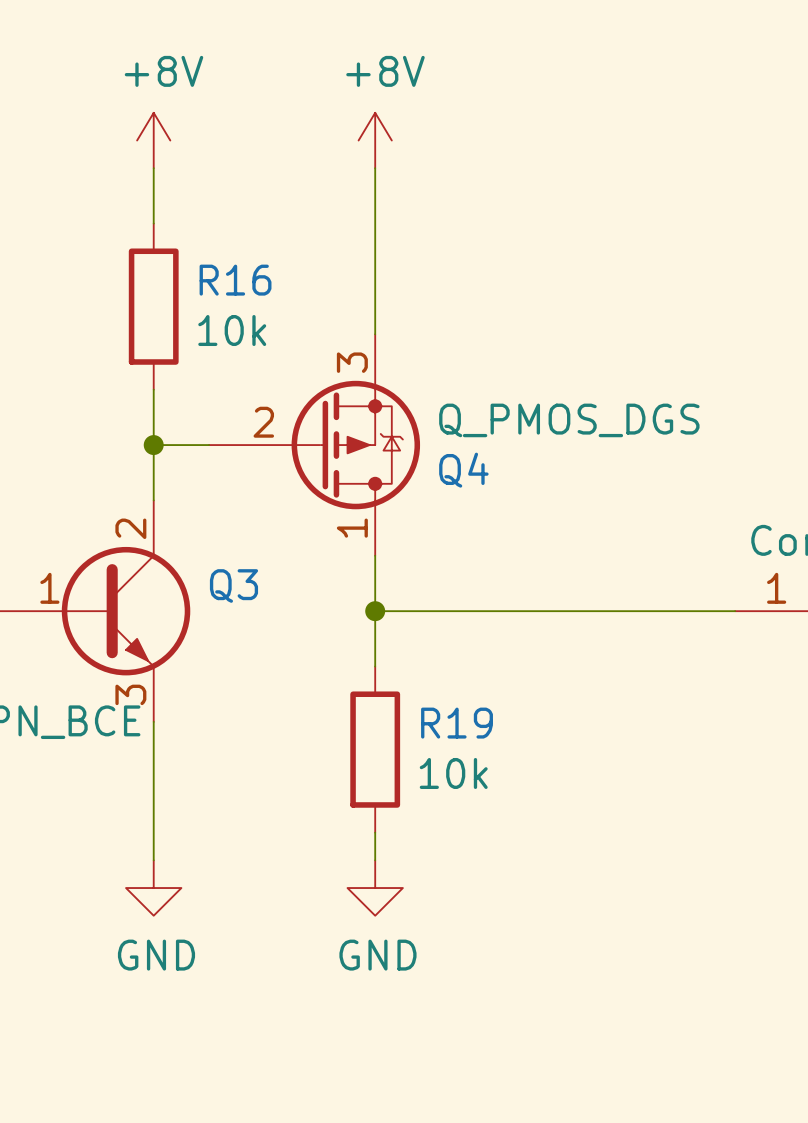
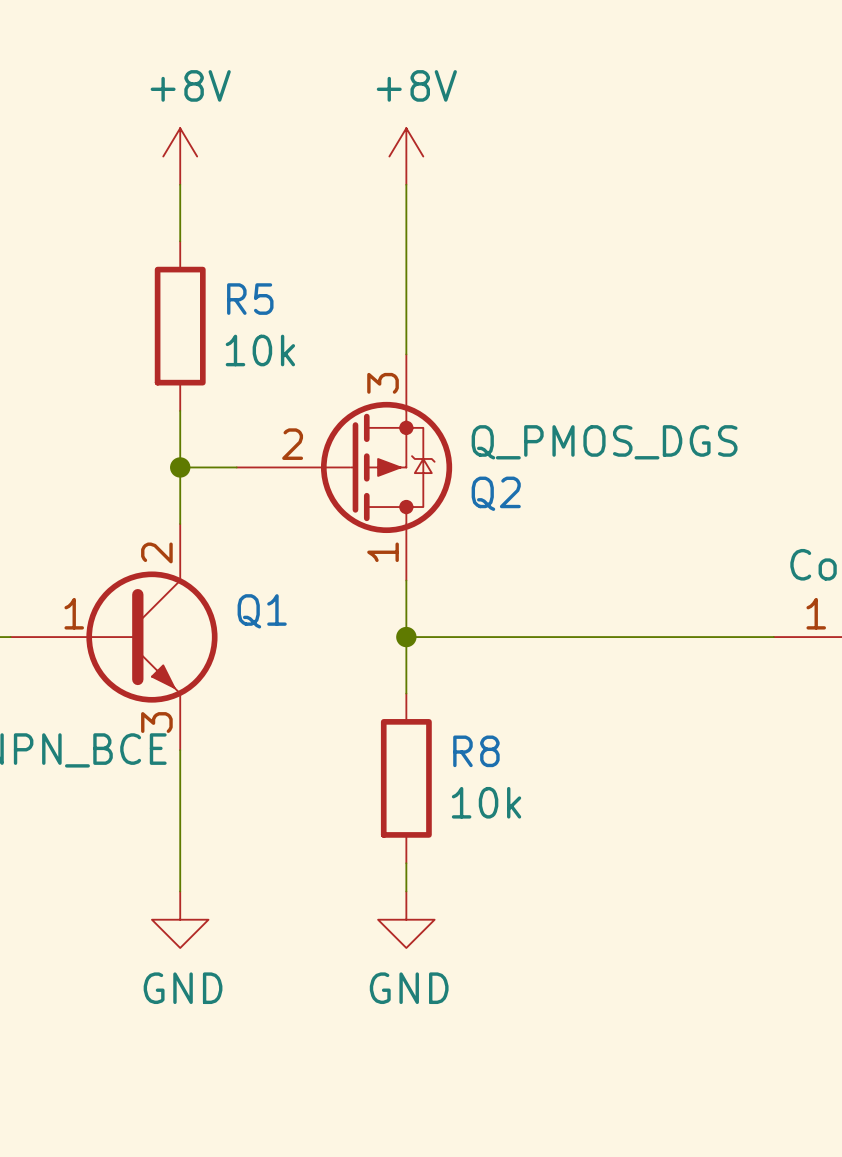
R16 name: R16 (235, 280) -> R5 (250, 299)
Q4 name: Q4 (463, 470) -> Q2 (496, 493)
Q3 name: Q3 (233, 585) -> Q1 (262, 611)
R19 name: R19 (457, 723) -> R8 (476, 751)

